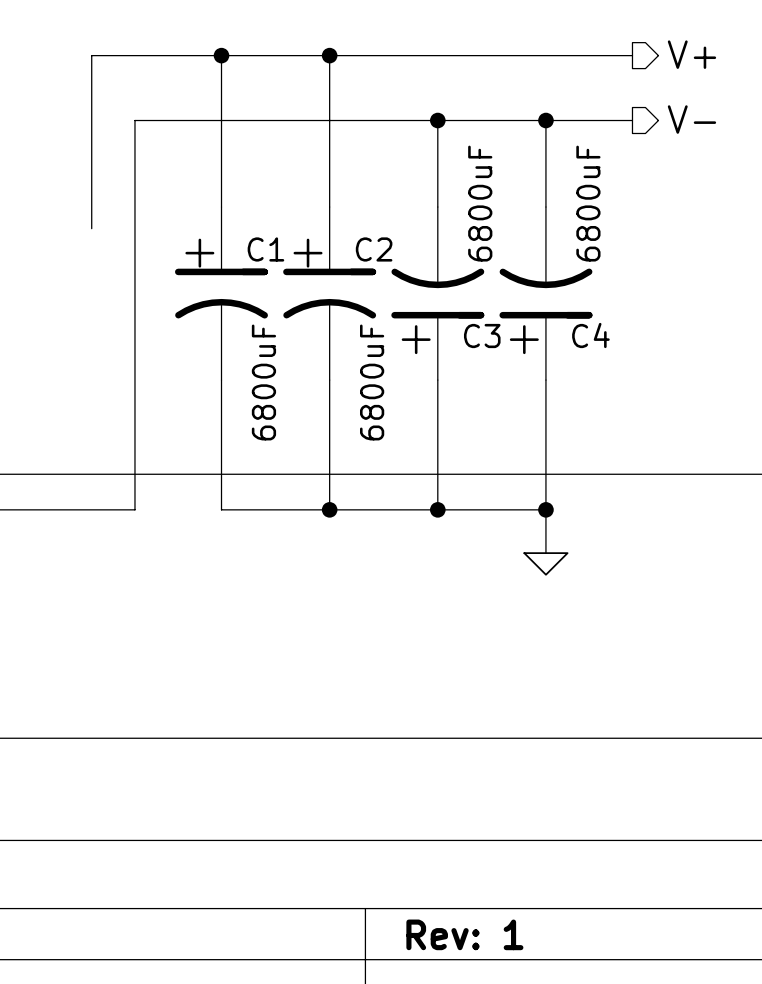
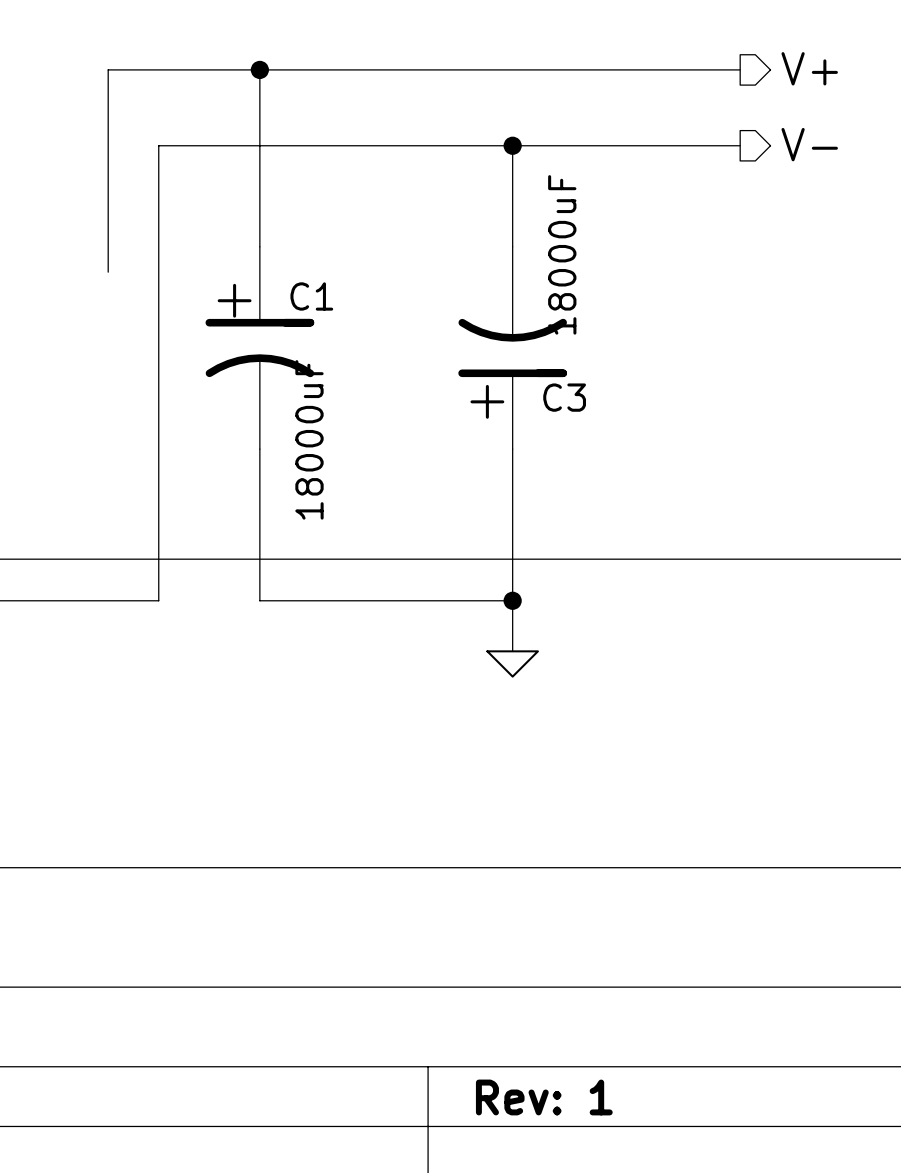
wire: (329, 55) (329, 207) -> none
junction: (329, 55) -> none
wire: (545, 120) (545, 207) -> none
junction: (545, 120) -> none
C3 value: 6800uF (480, 203) -> 18000uF (562, 254)
C2: 6800uF (329, 293) -> none
C4: 6800uF (545, 293) -> none
wire: (329, 380) (329, 509) -> none
wire: (545, 380) (545, 553) -> none
C1 value: 6800uF (263, 382) -> 18000uF (309, 439)
junction: (329, 509) -> none
wire: (437, 509) (545, 509) -> (512, 600) (512, 651)
junction: (545, 509) -> none
power symbol position: (545, 563) -> (512, 663)

